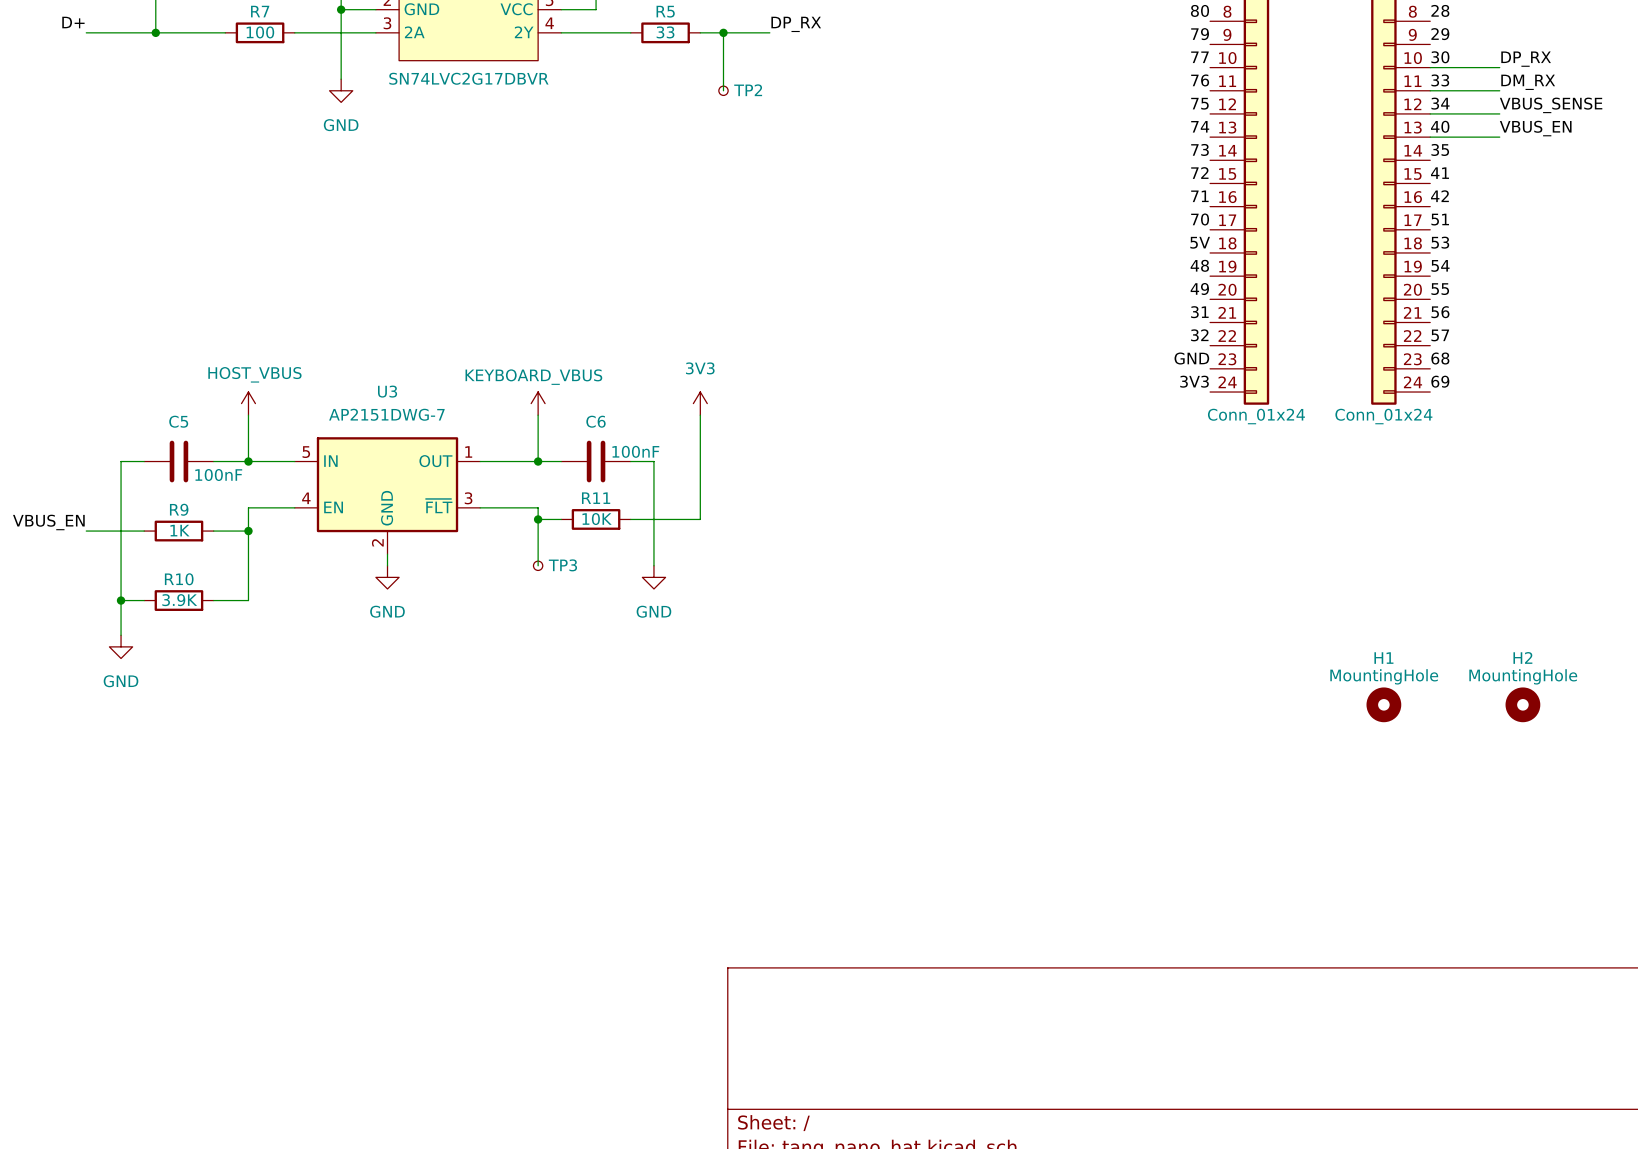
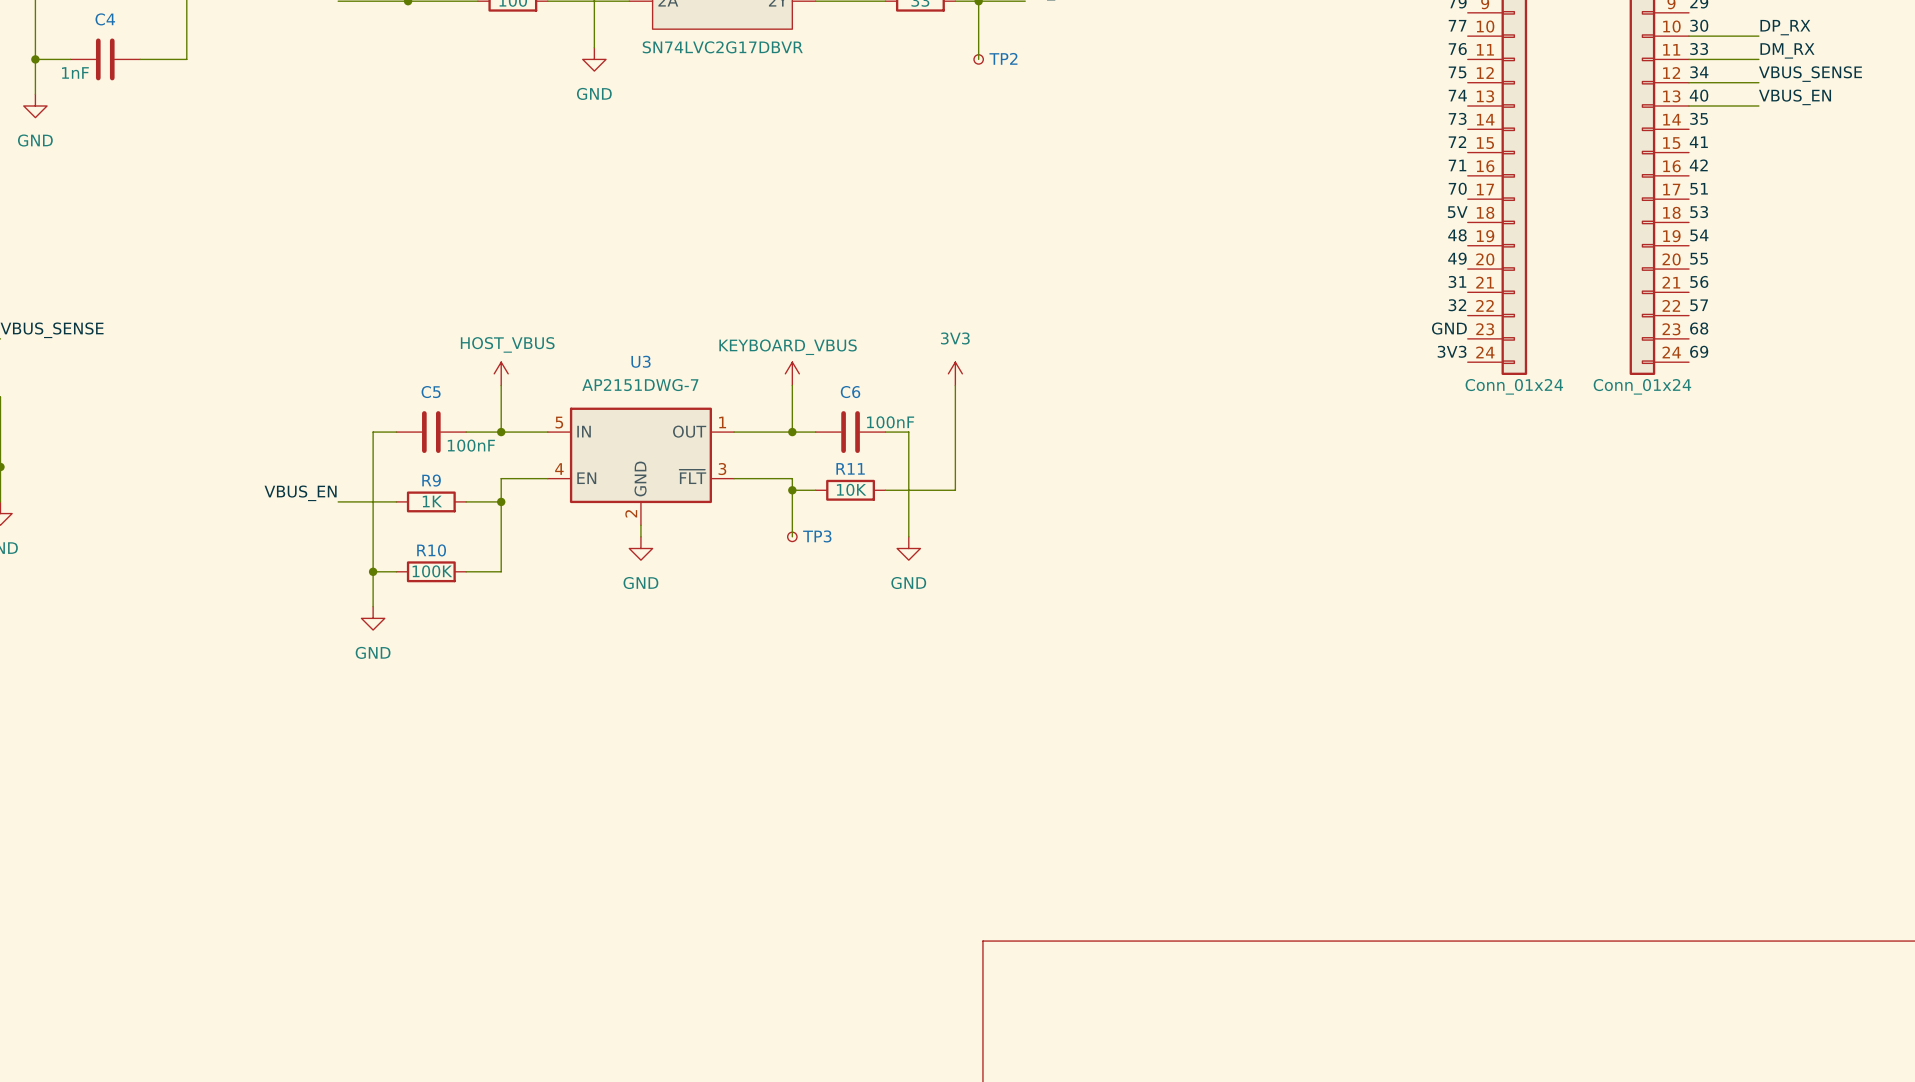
R10 value: 3.9K (179, 600) -> 100K (432, 571)
H1: MountingHole (1383, 704) -> none
H2: MountingHole (1522, 704) -> none

